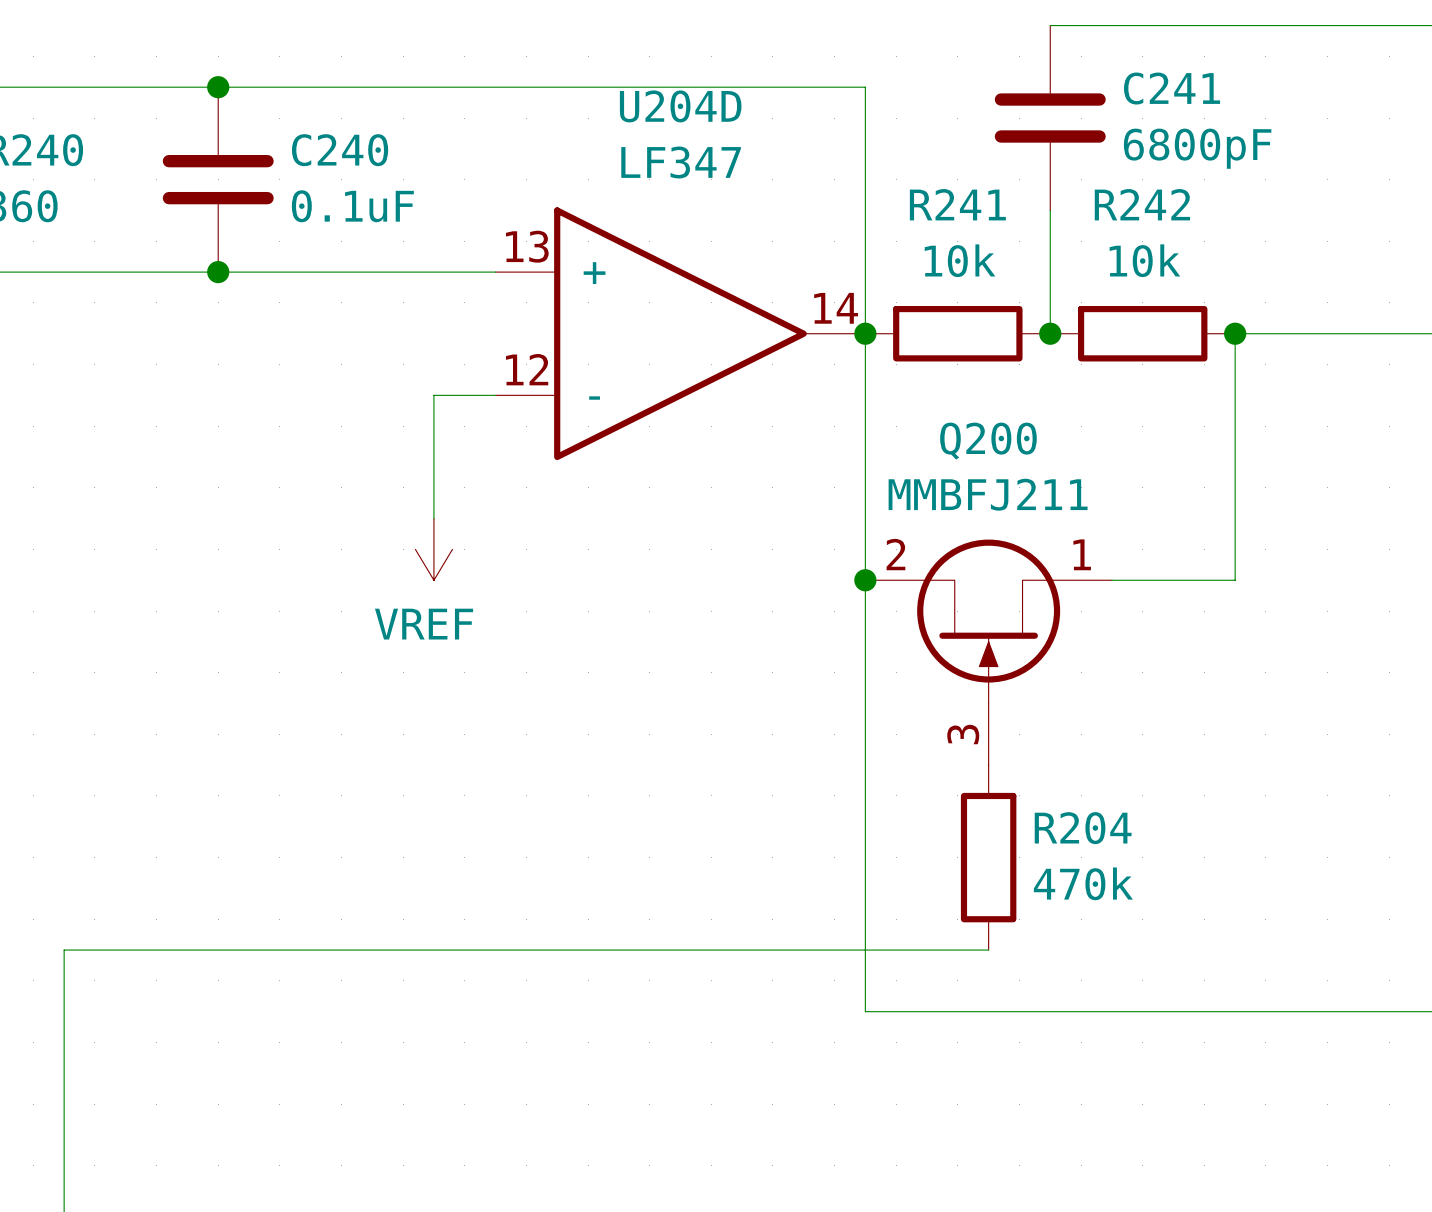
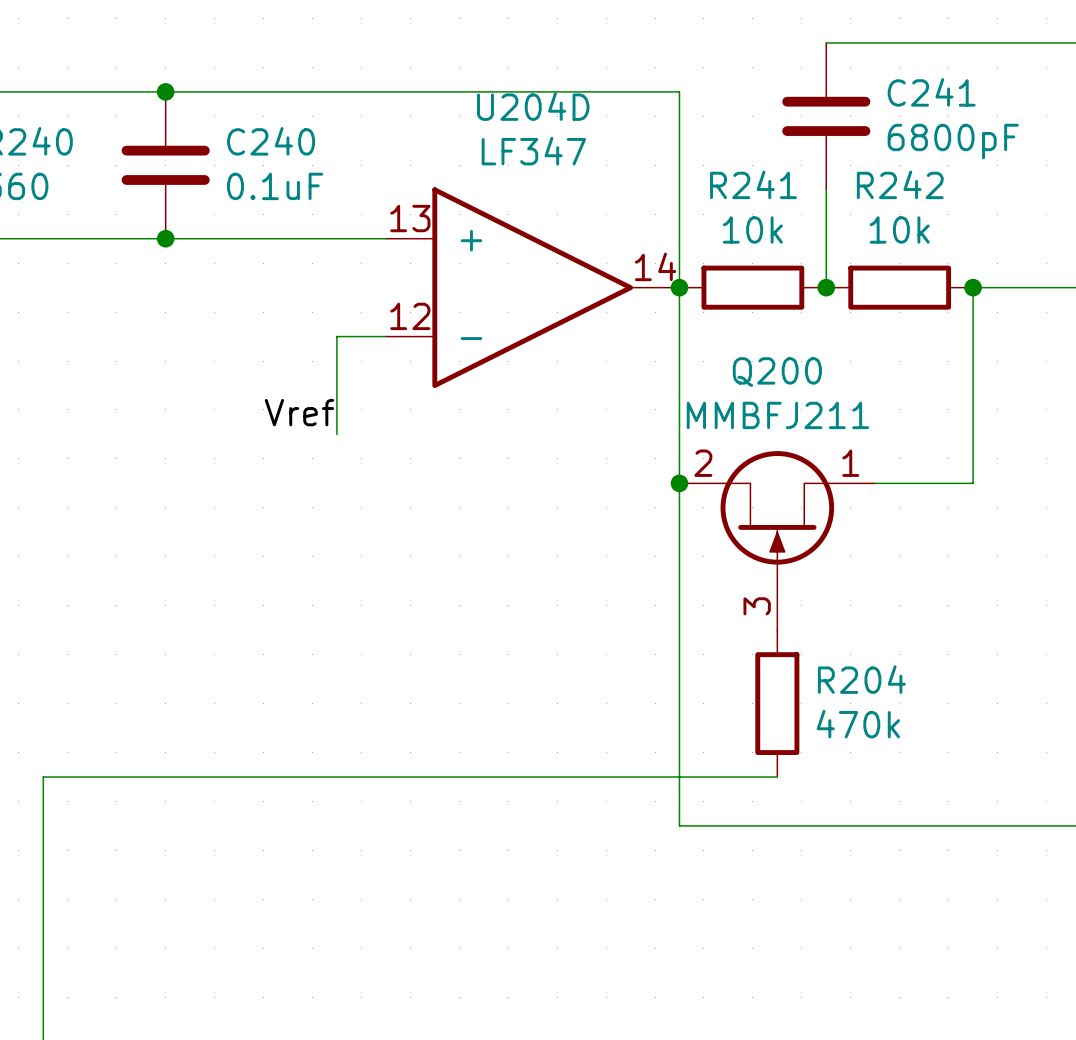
label: none -> Vref (299, 412)
power symbol: VREF (433, 549) -> none

